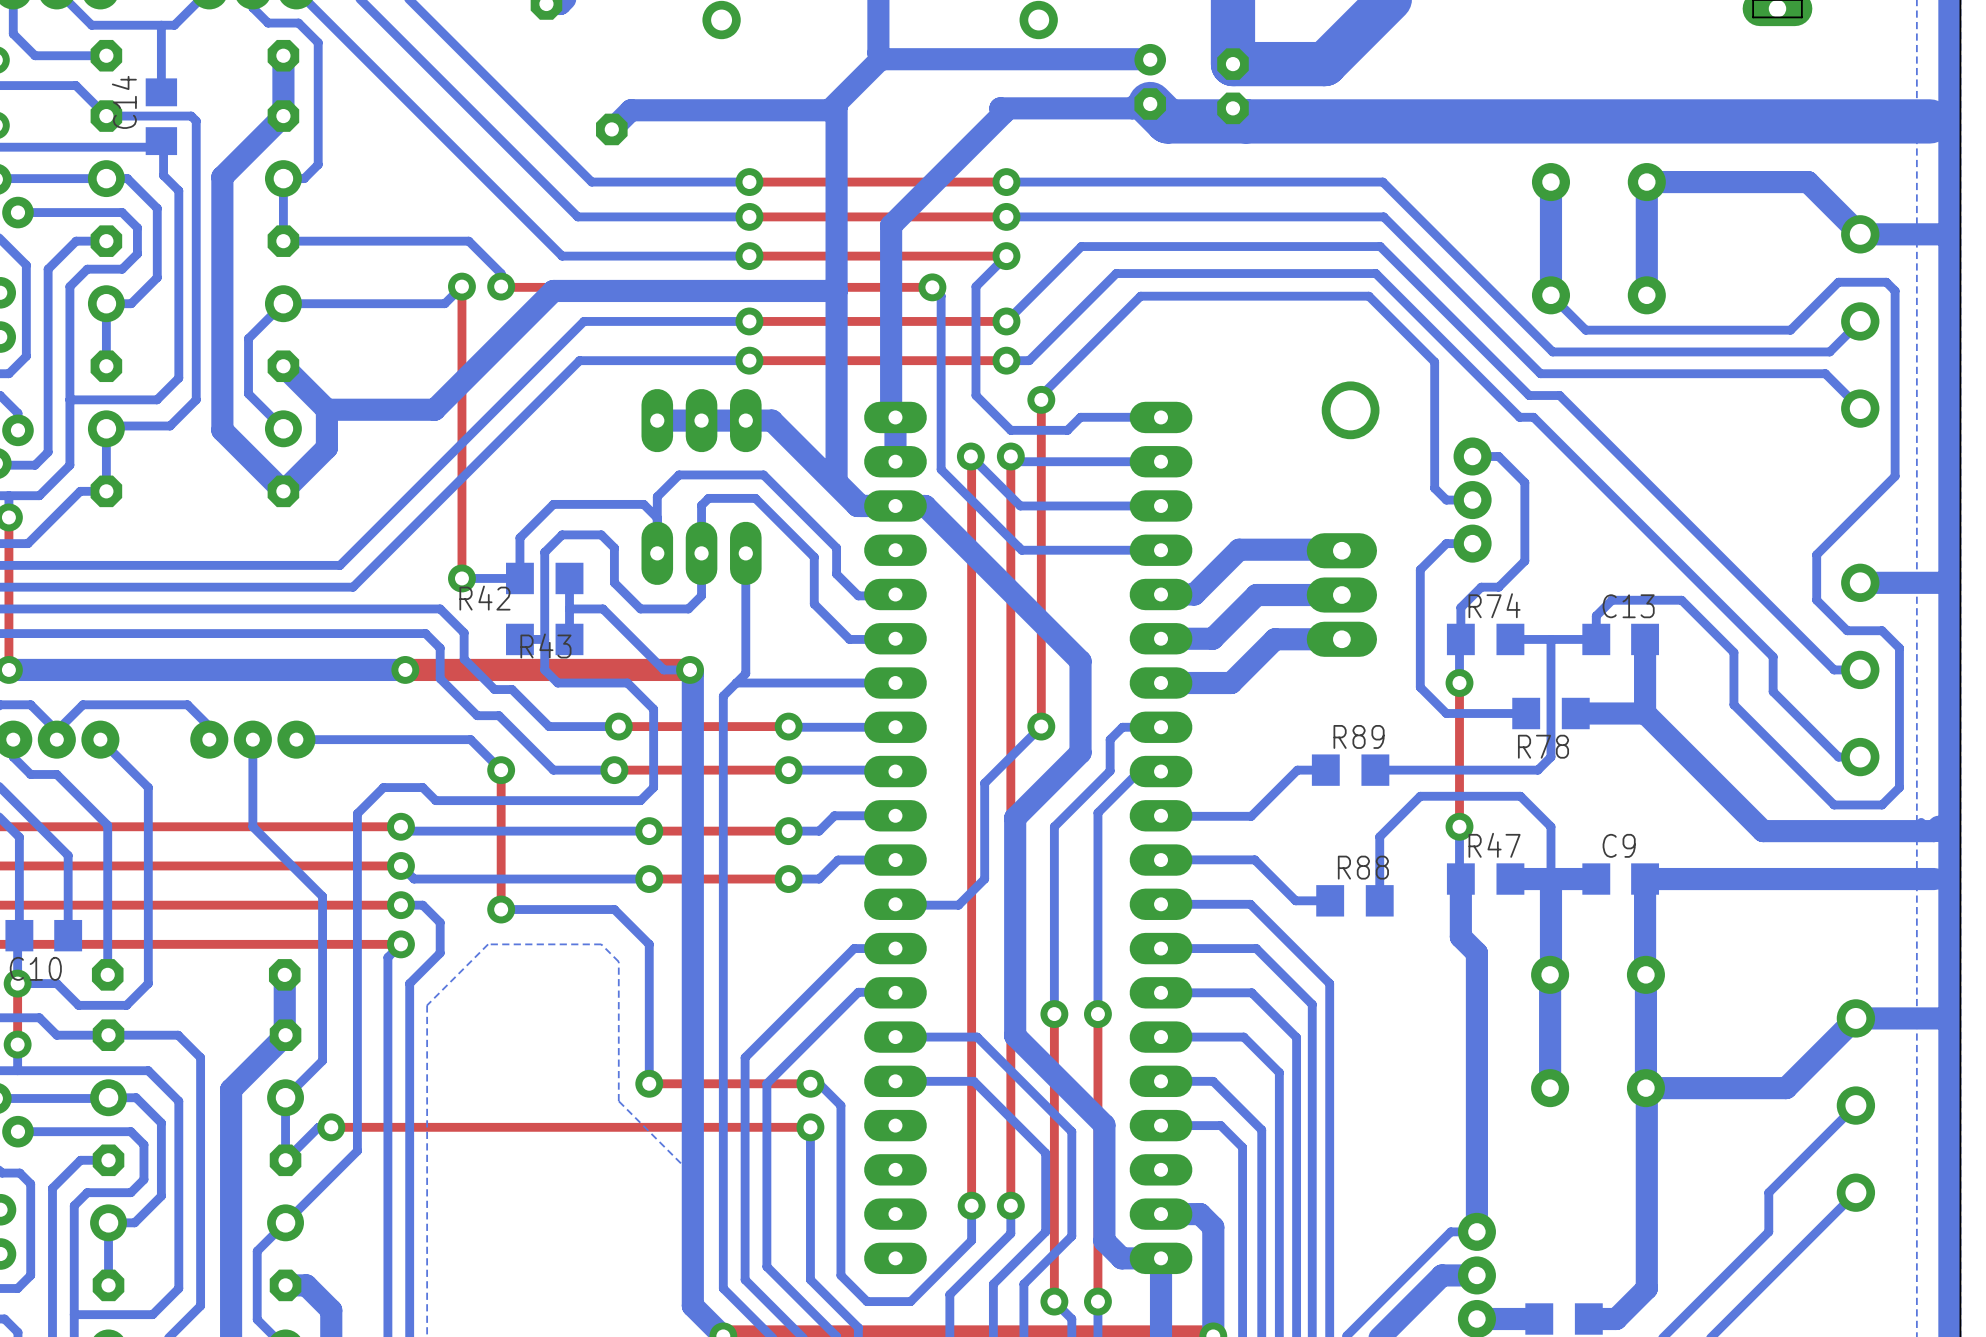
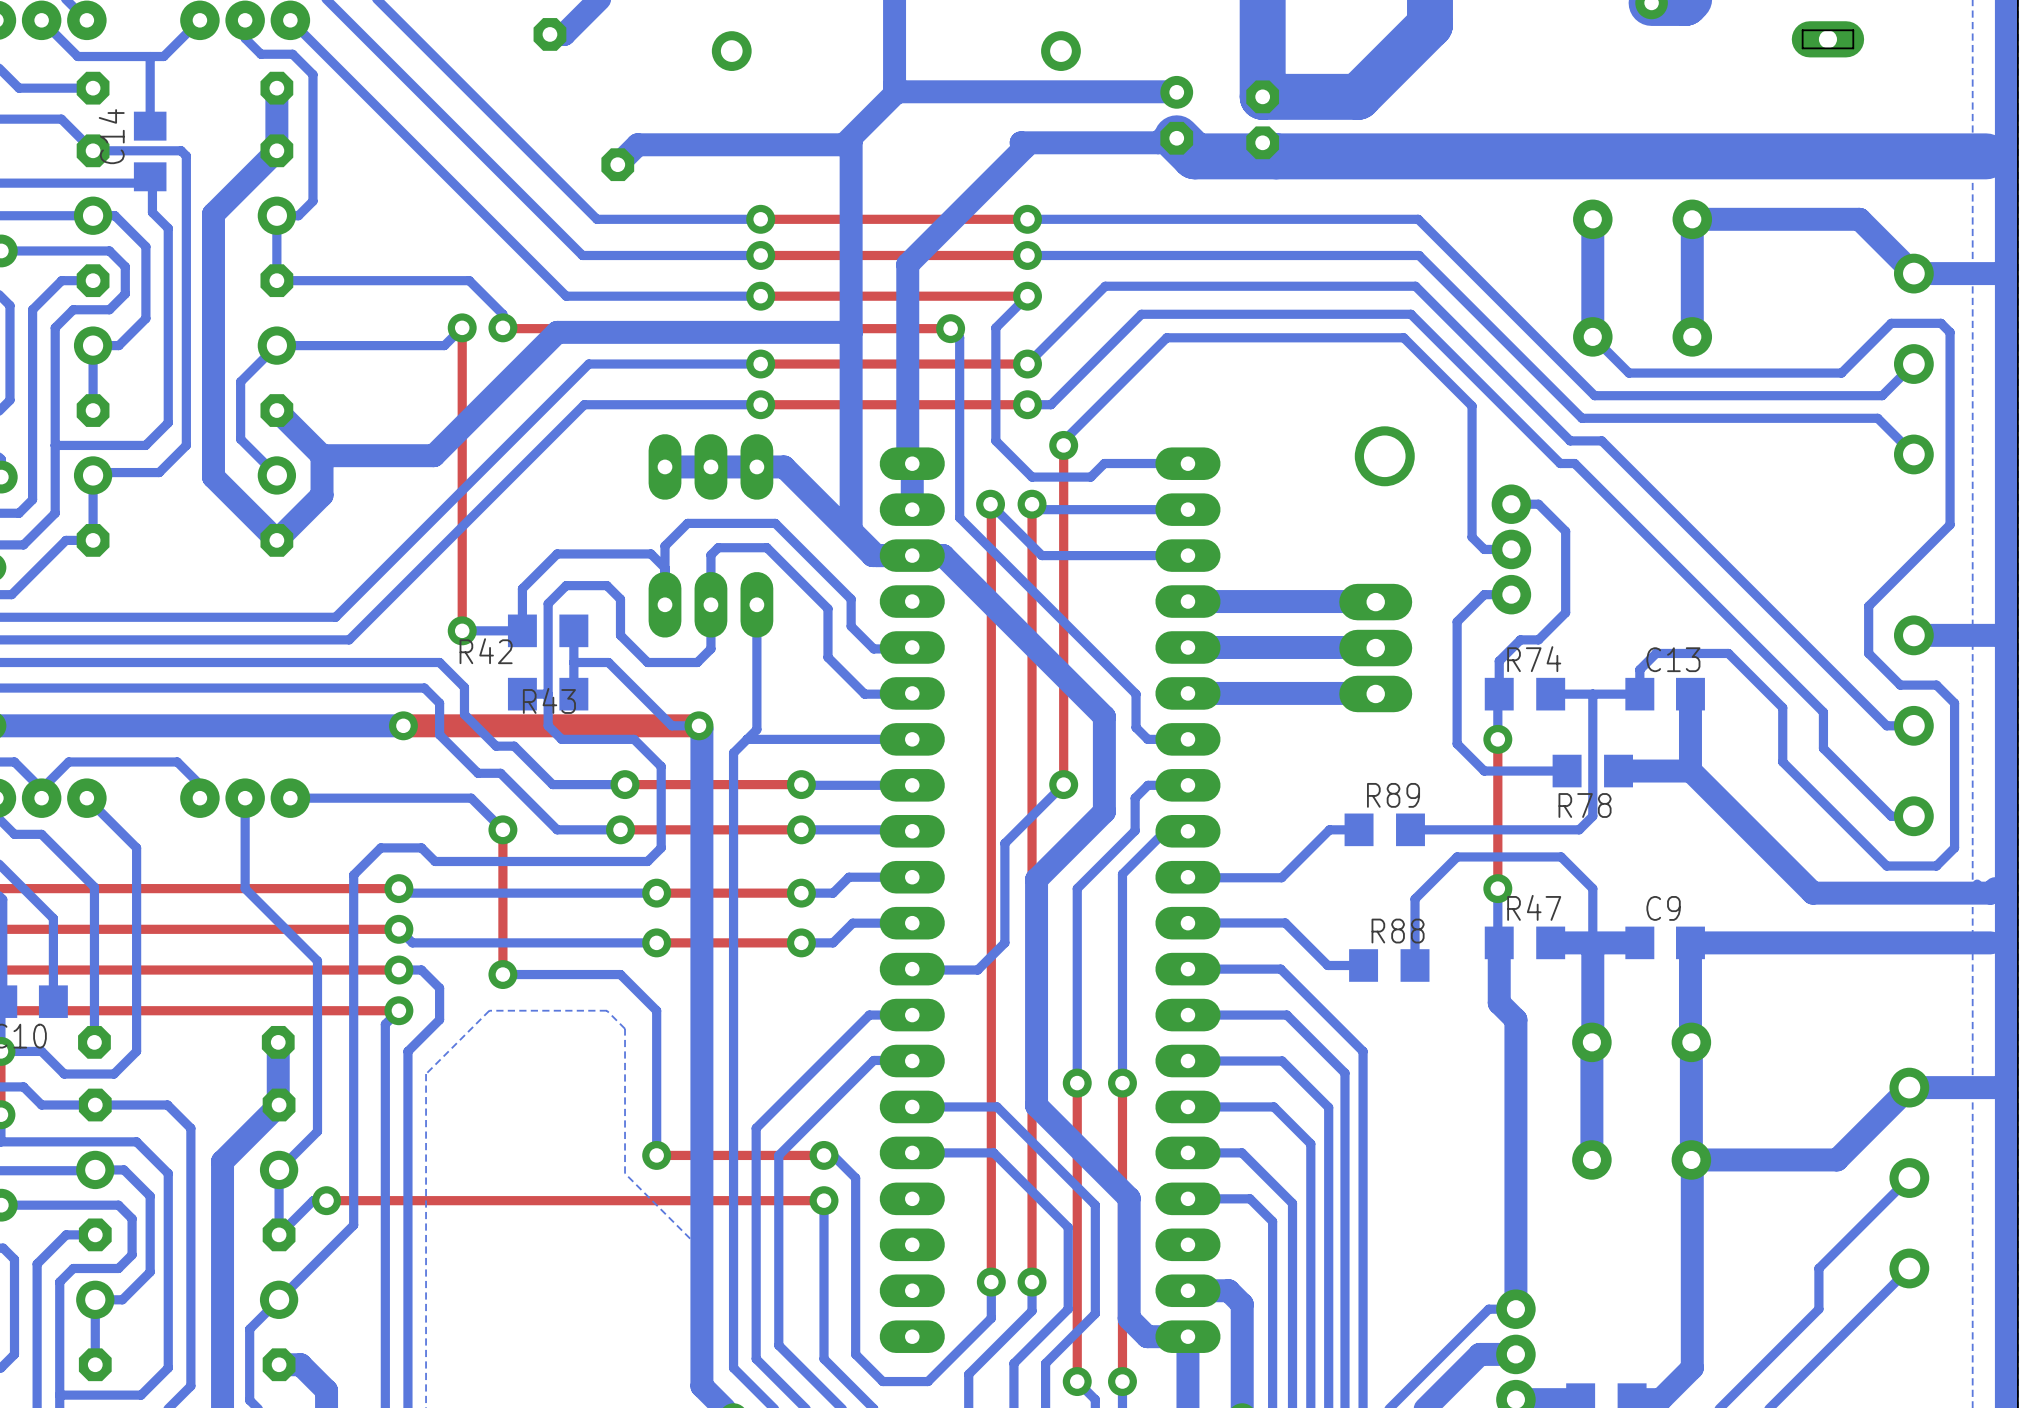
bottom track: (1161, 550) (1021, 550) -> (1187, 739) (1147, 739) (1136, 727) (1136, 694) (1043, 601)
bottom track: (1341, 550) (1239, 549) (1194, 594) -> (1375, 648) (1222, 647)
bottom track: none -> (1375, 601) (1187, 601)
bottom track: (1341, 595) (1256, 595) (1212, 638) -> (1375, 693) (1241, 693)
bottom track: (1341, 639) (1274, 639) (1231, 683) (1161, 683) -> none

